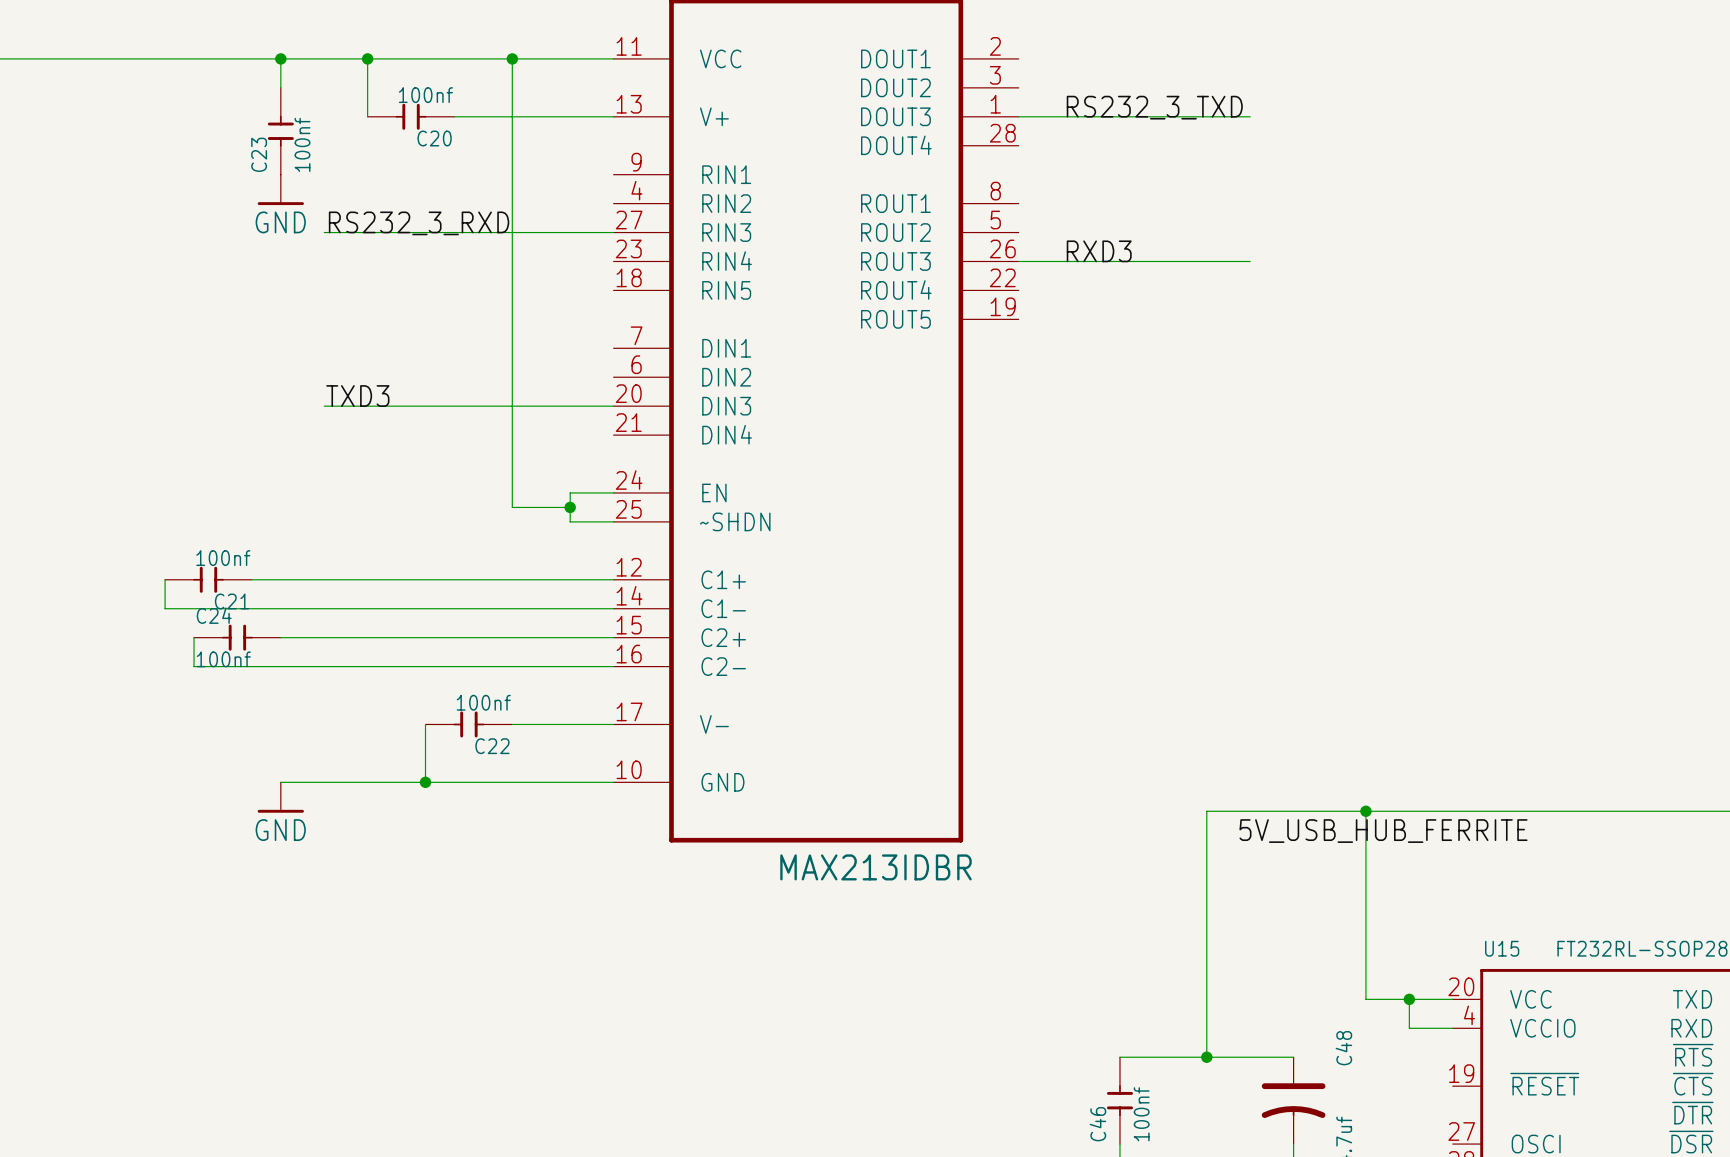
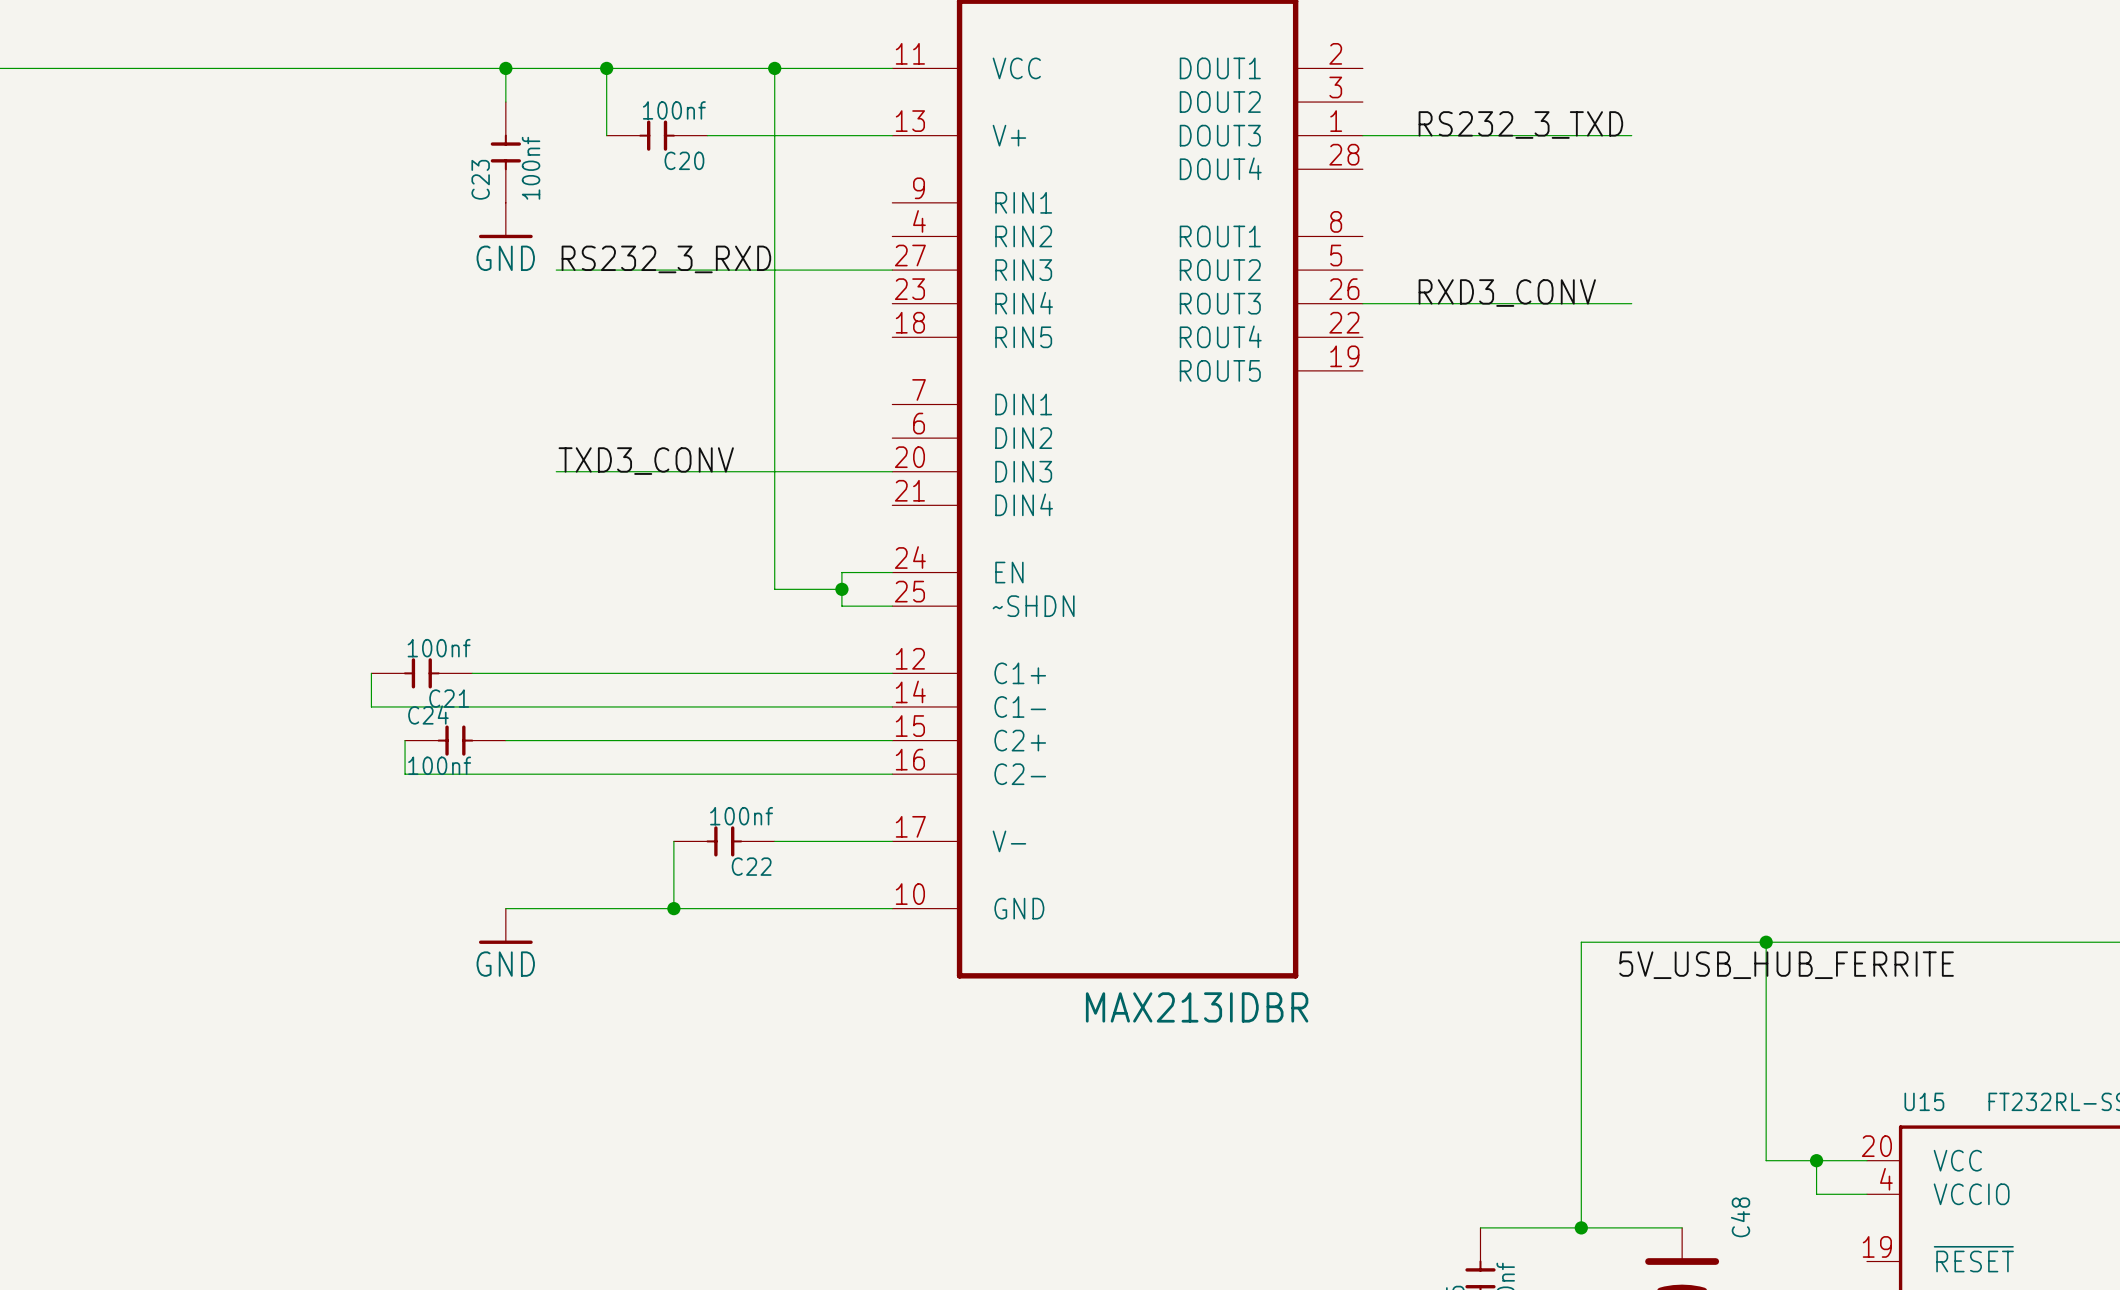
label: RXD3 (1099, 251) -> RXD3_CONV (1507, 293)
label: TXD3 (357, 396) -> TXD3_CONV (646, 461)

